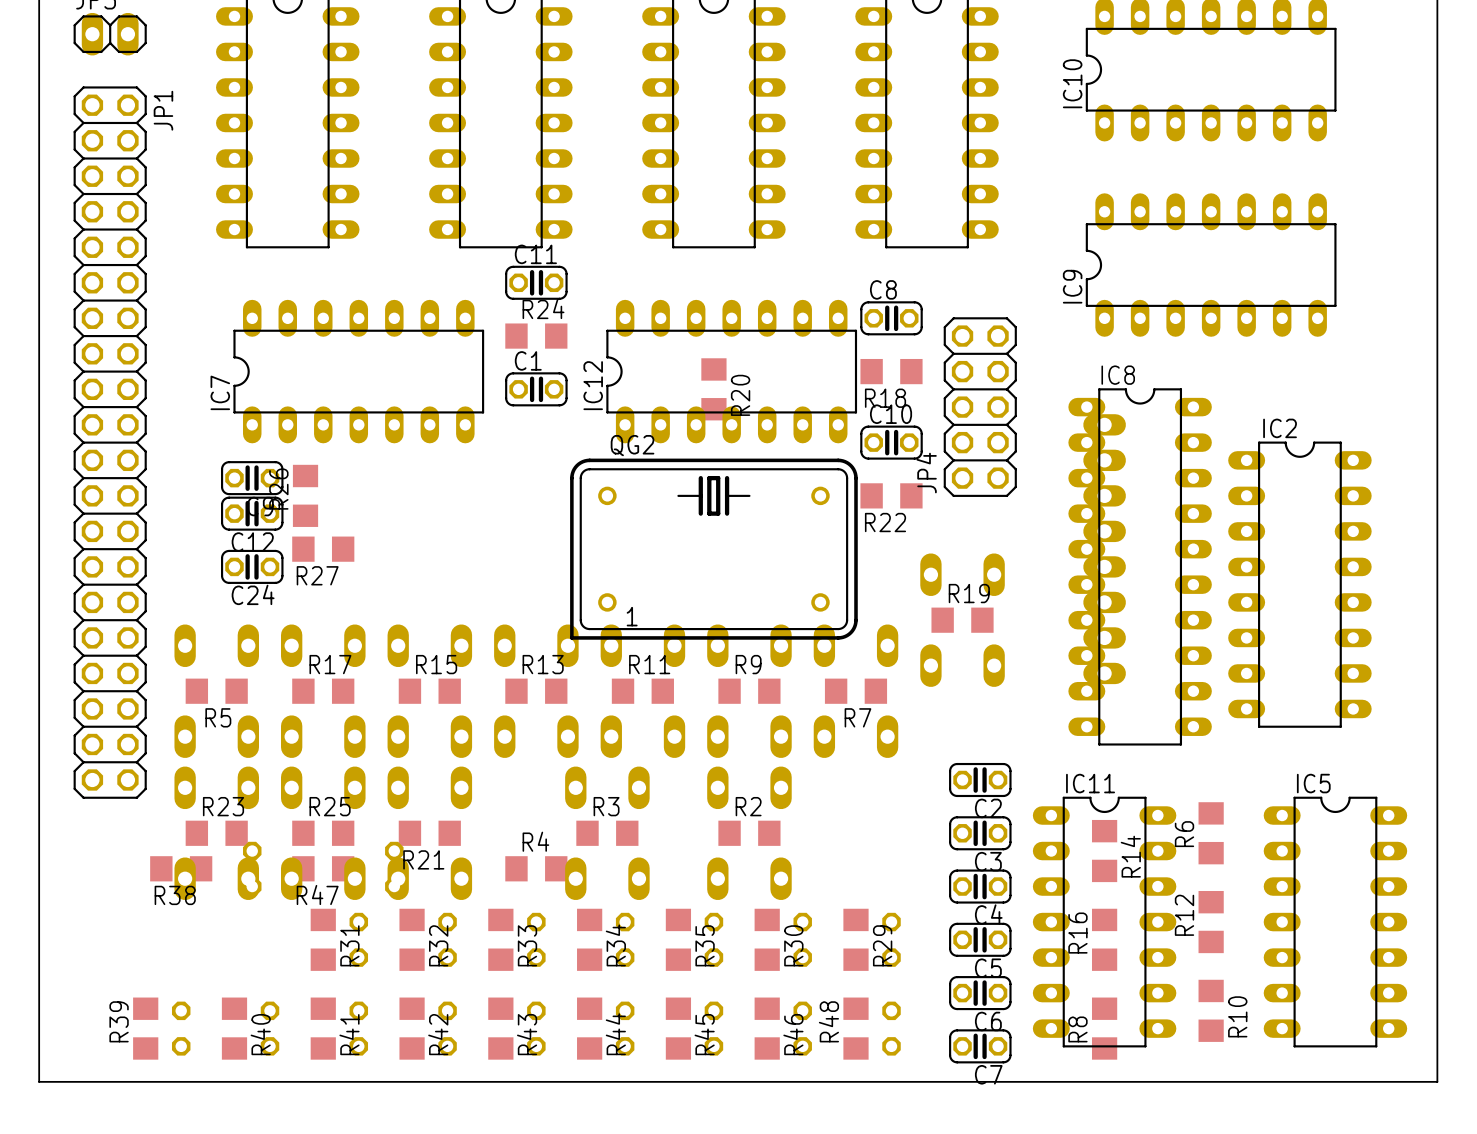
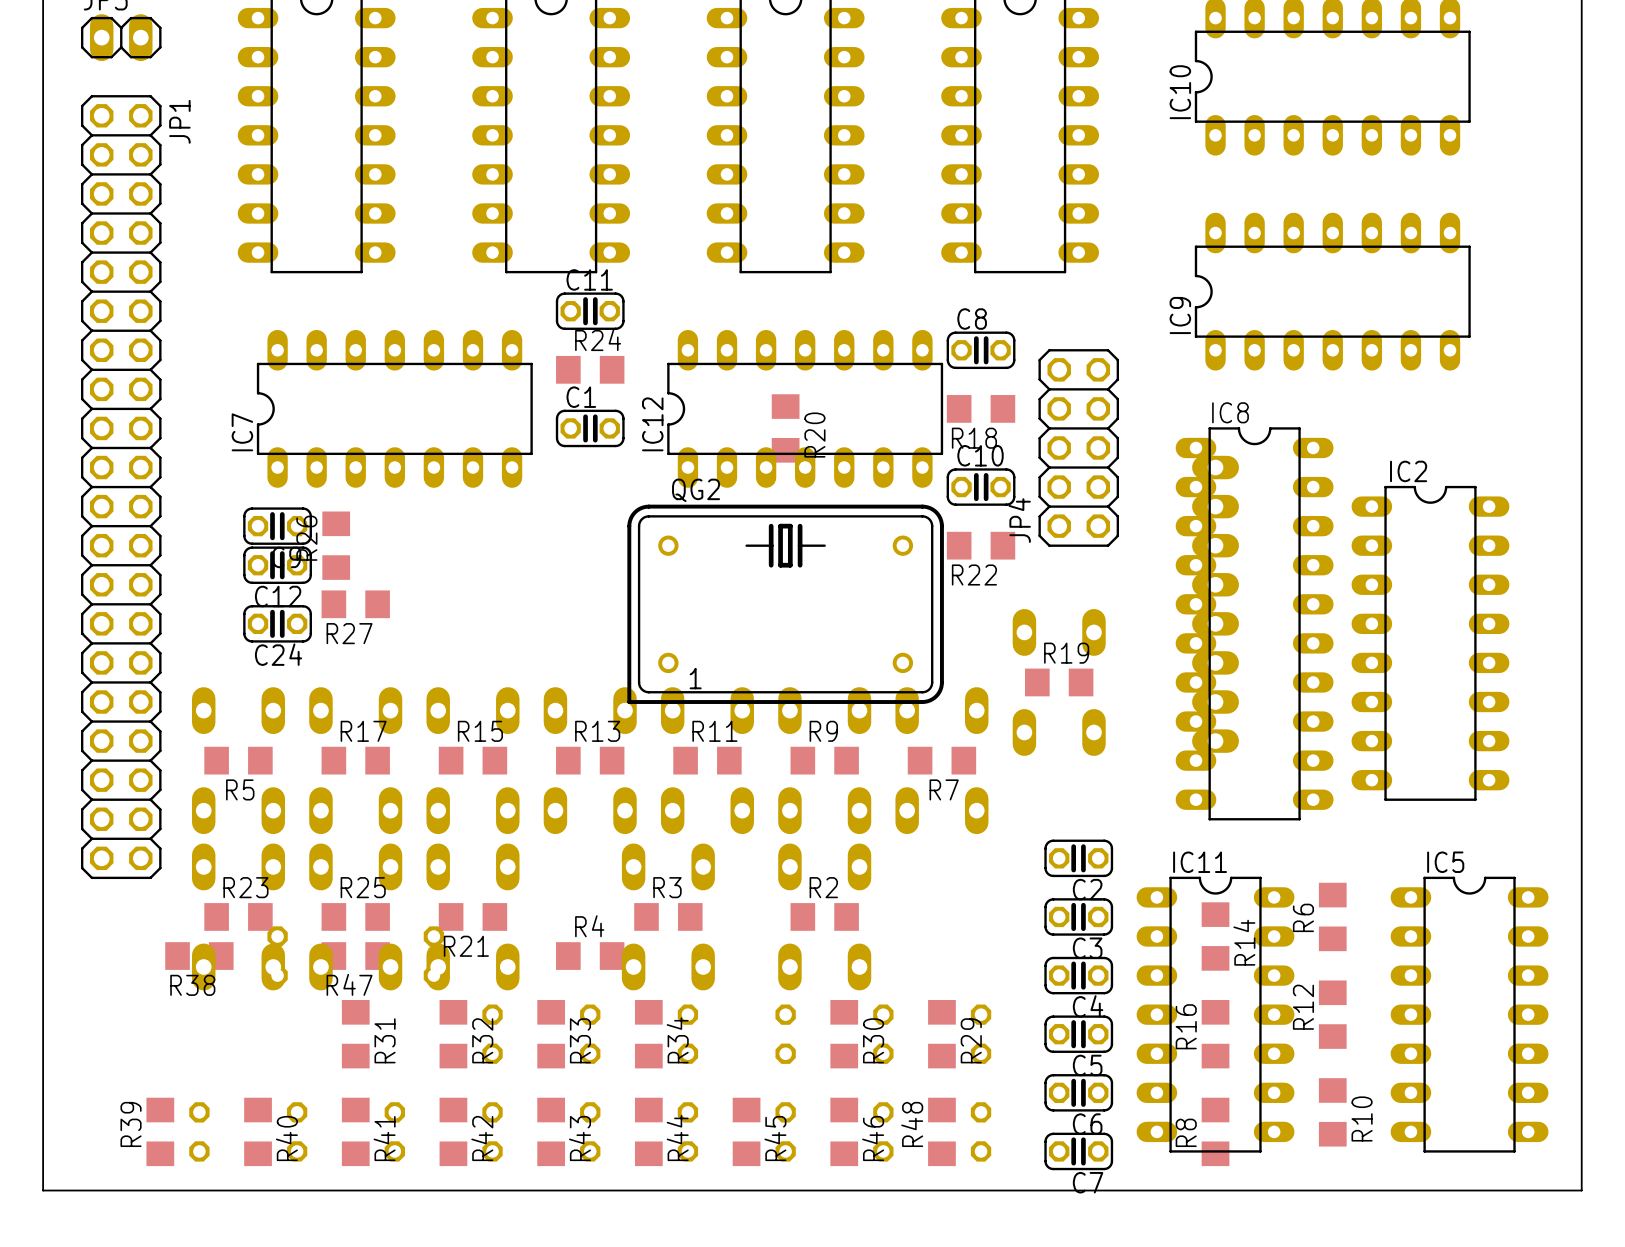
part: (358, 939) -> none
R35: (678, 939) -> none

